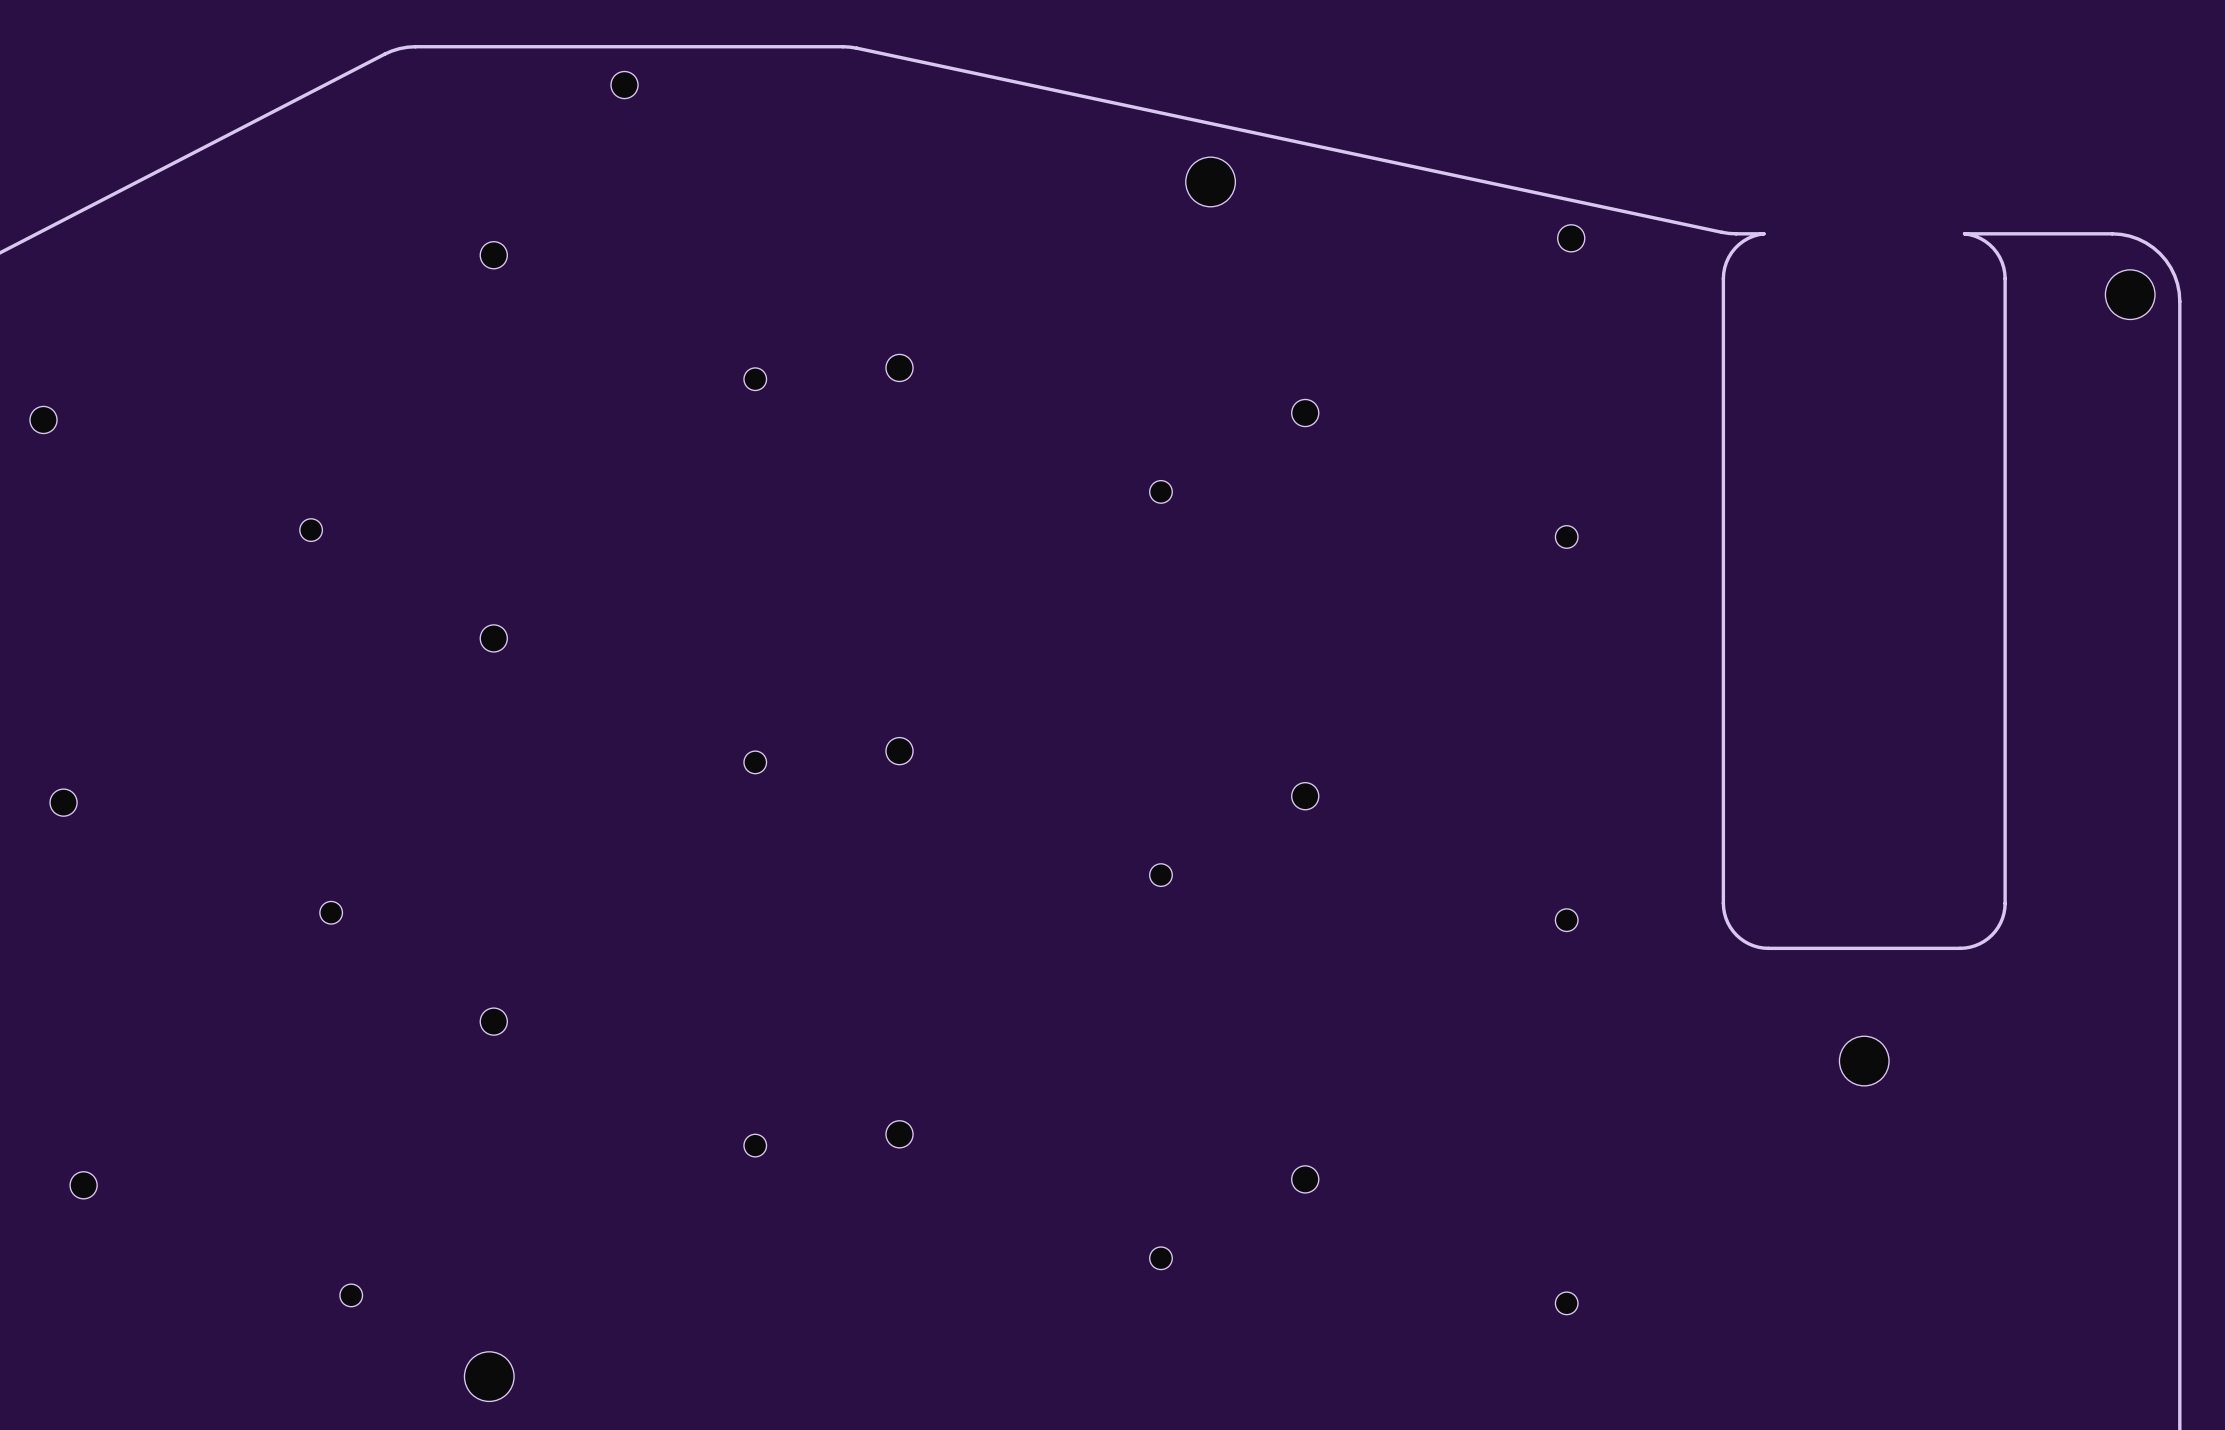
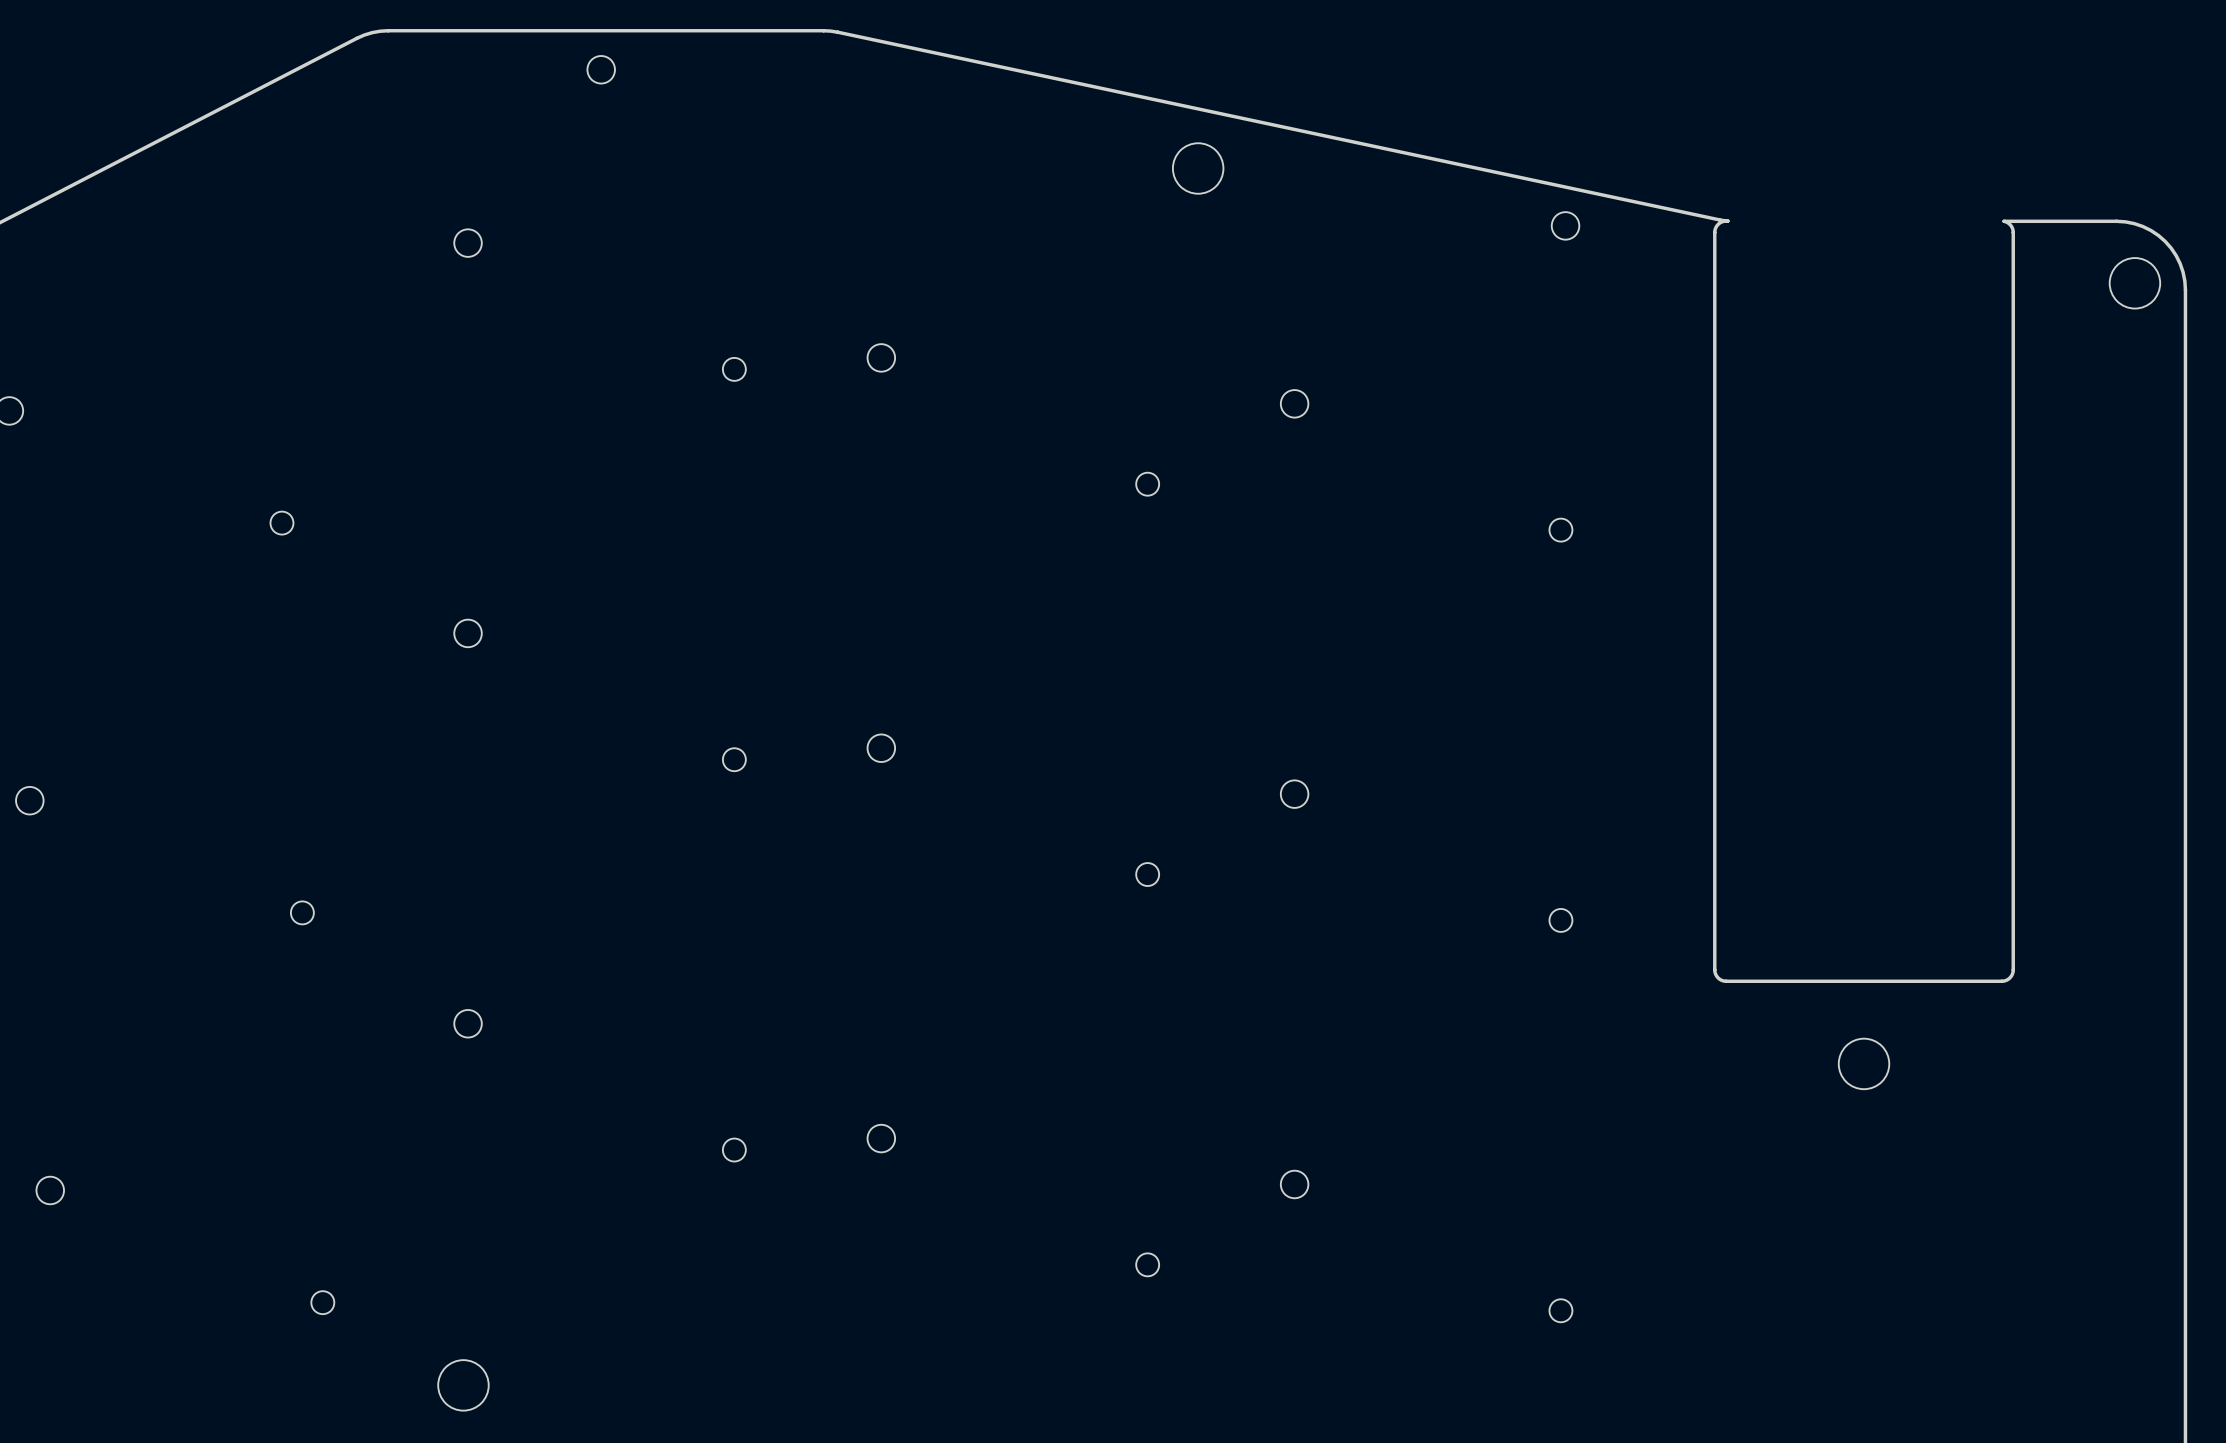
board edge: (1722, 232) (1763, 233) (1748, 238) (1735, 248) (1726, 262) (1723, 278) (1723, 908) (1727, 922) (1736, 935) (1753, 945) (1768, 948) (1965, 948) (1979, 943) (1988, 938) (1995, 931) (2002, 918) (2005, 903) (2005, 278) (2002, 262) (1993, 248) (1980, 238) (1964, 233) (2001, 233) -> (1719, 219) (1727, 221) (1719, 223) (1714, 232) (1714, 969) (1718, 977) (1726, 981) (2001, 981) (2007, 979) (2012, 973) (2013, 232) (2010, 225) (2004, 221)

